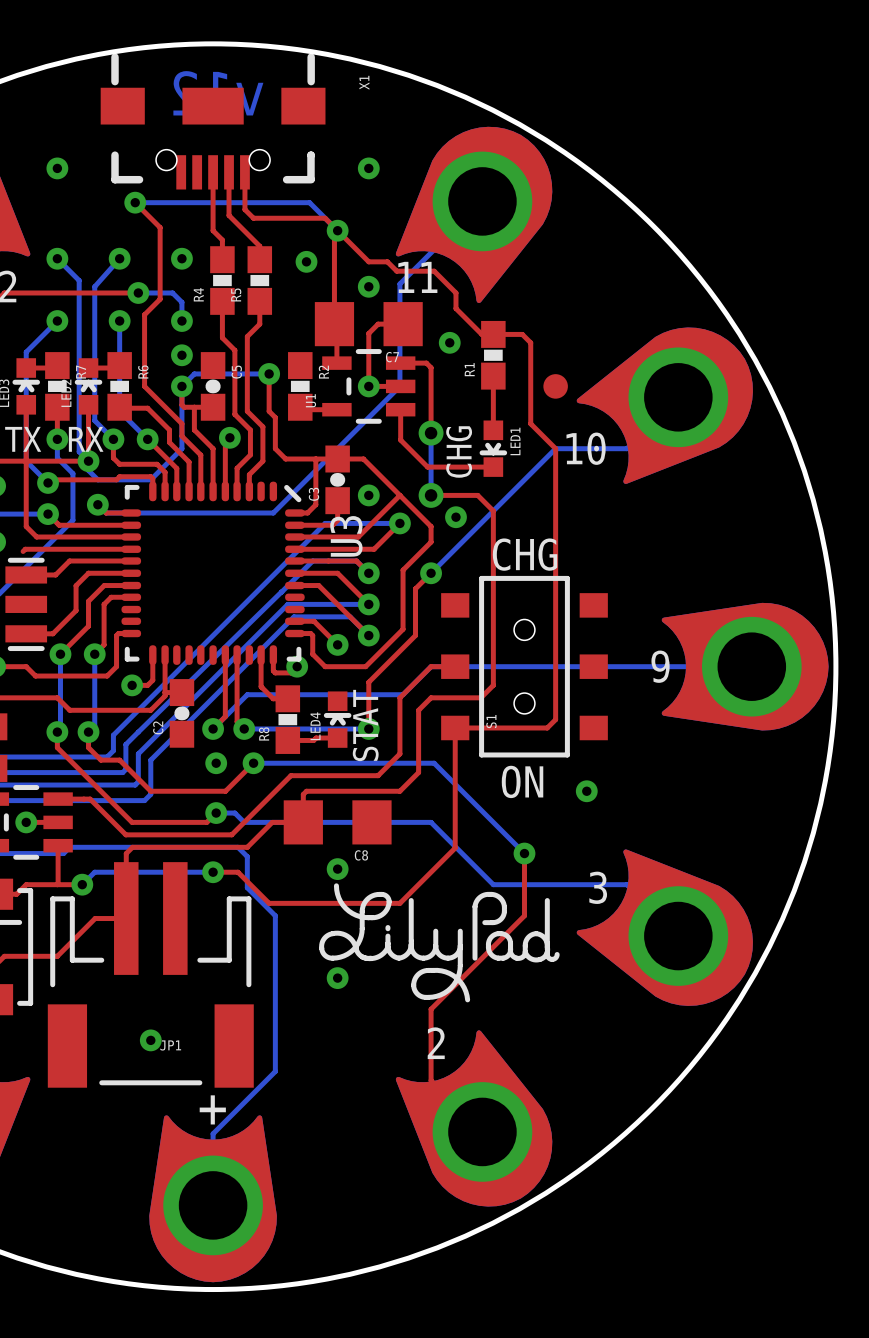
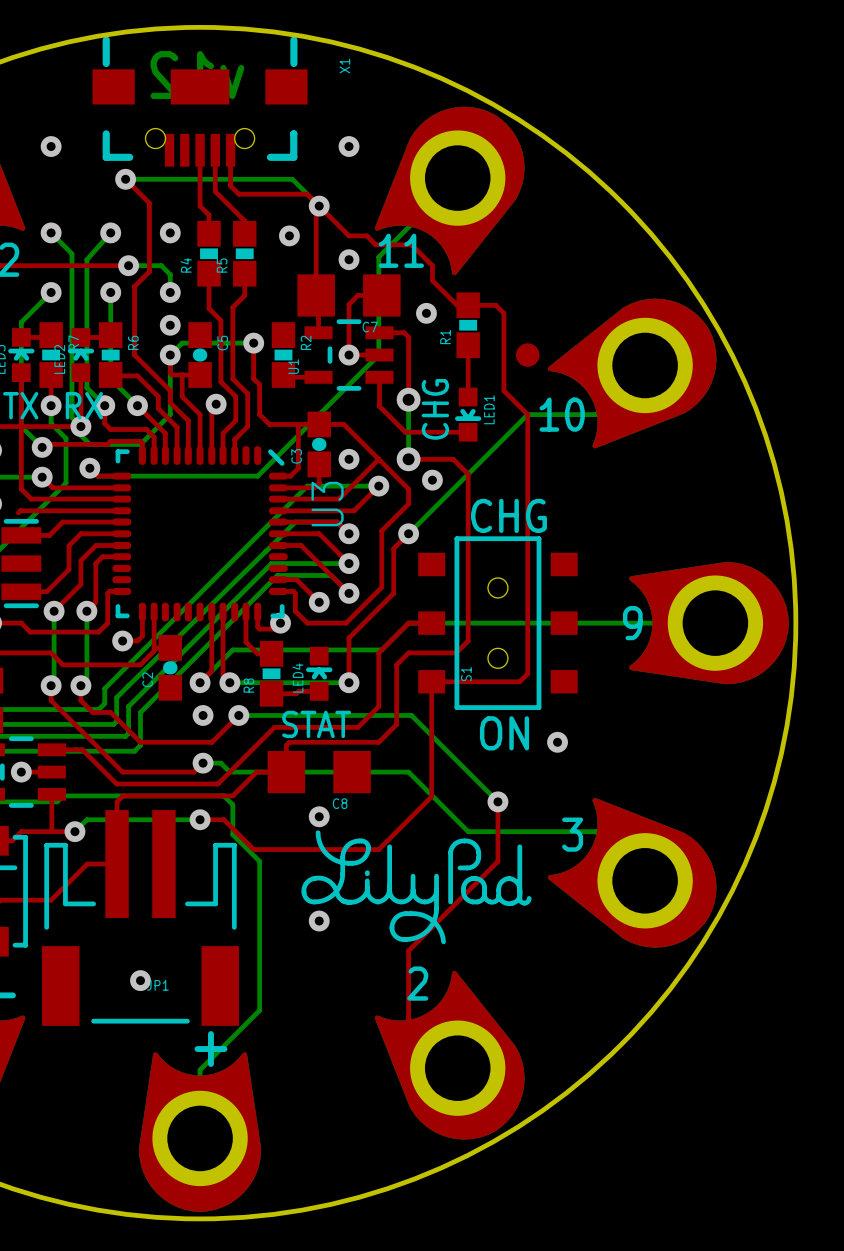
text rotation: 0° (365, 725) -> 90° clockwise (316, 724)

